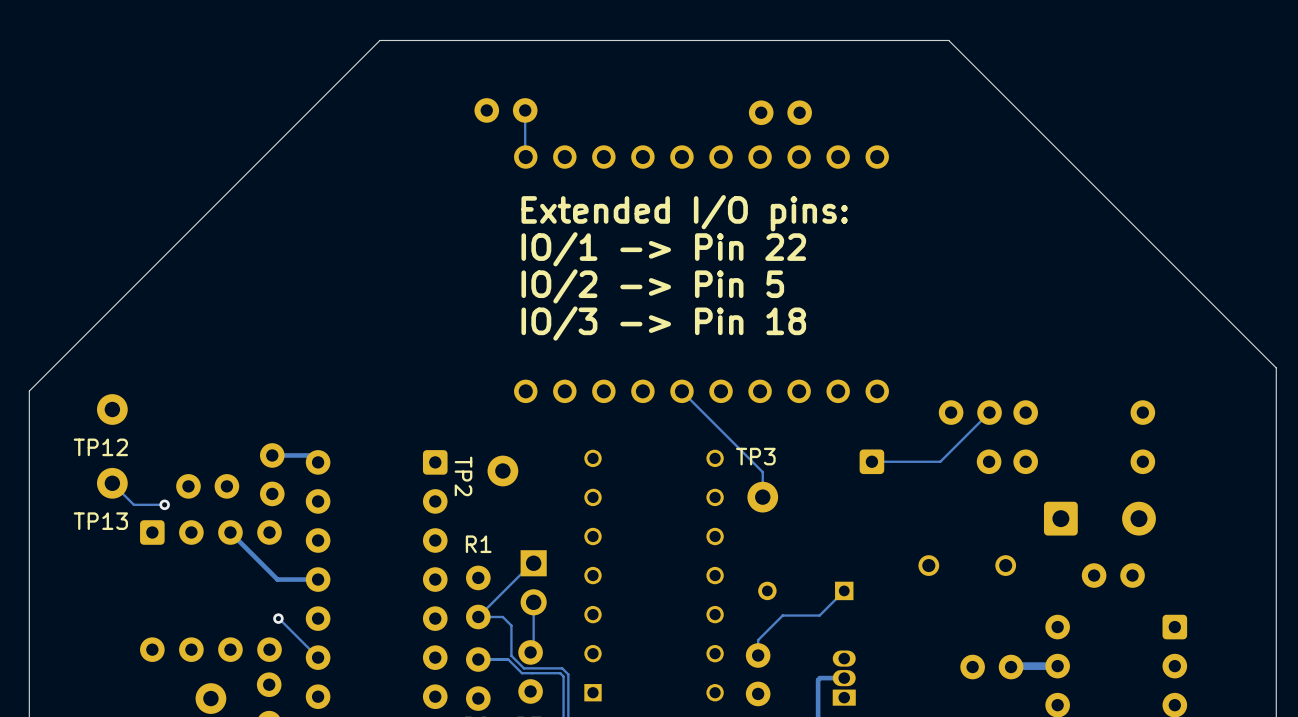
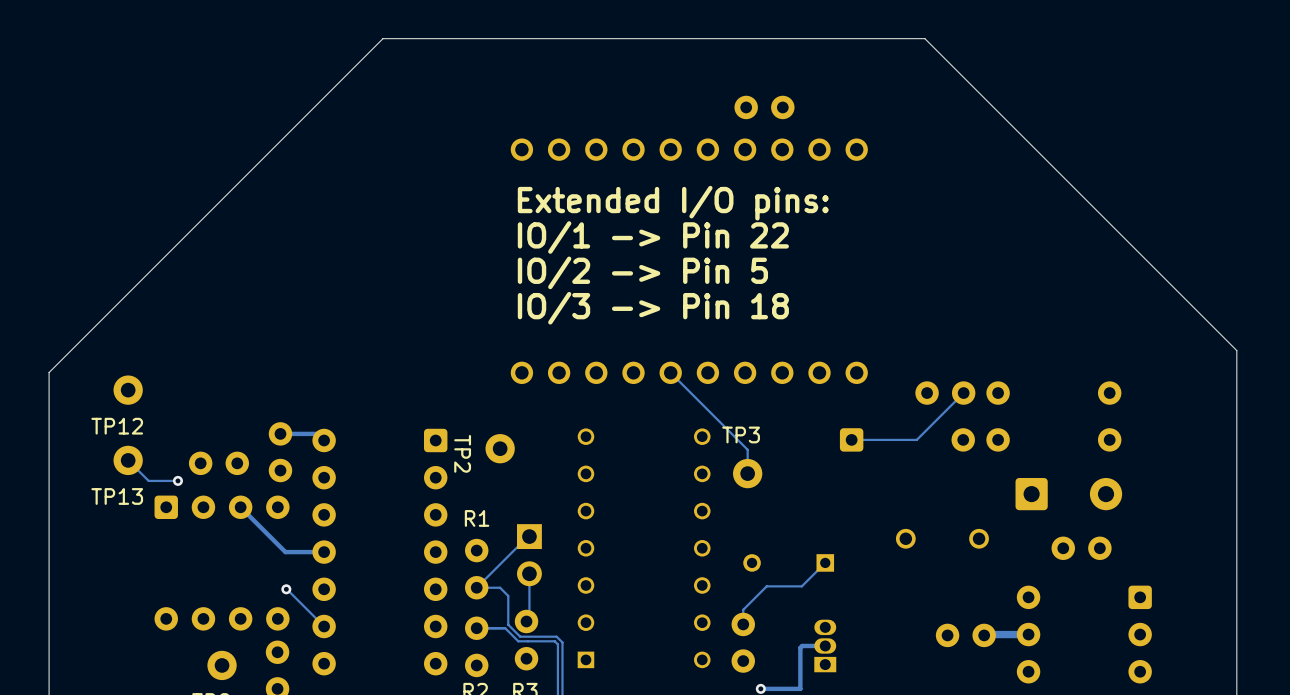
part: (505, 110) -> none
track: (525, 110) (525, 156) -> none

